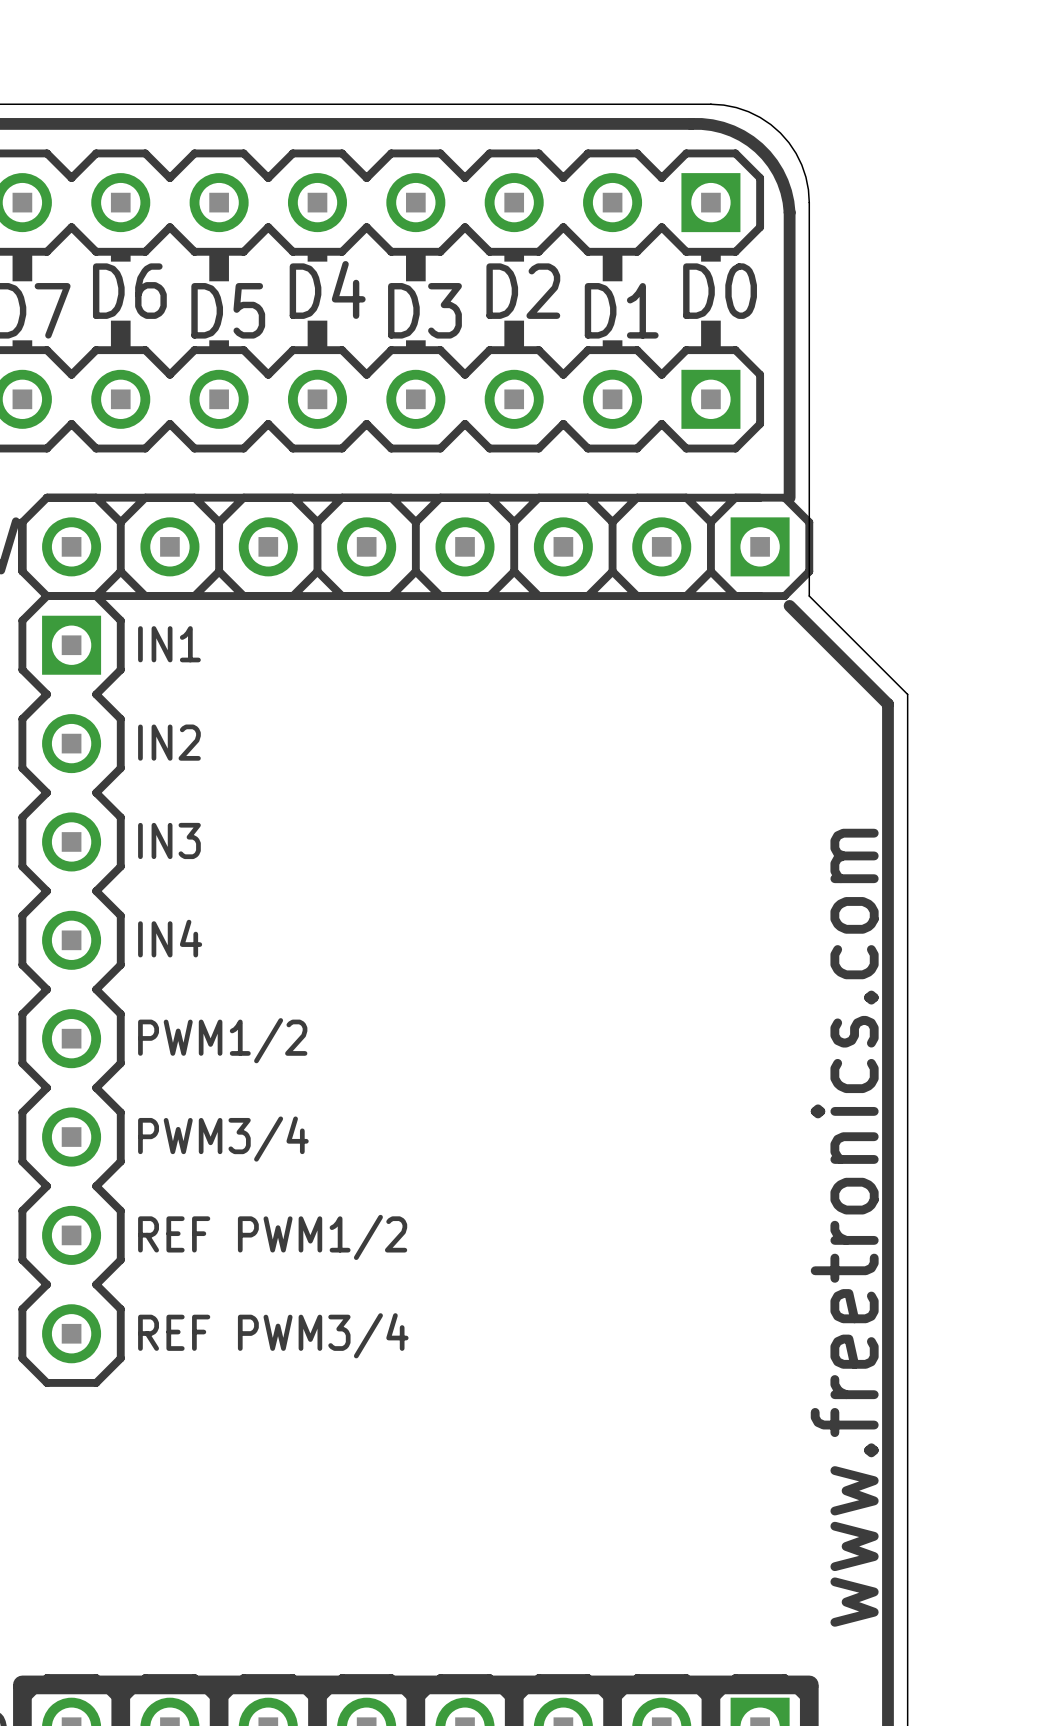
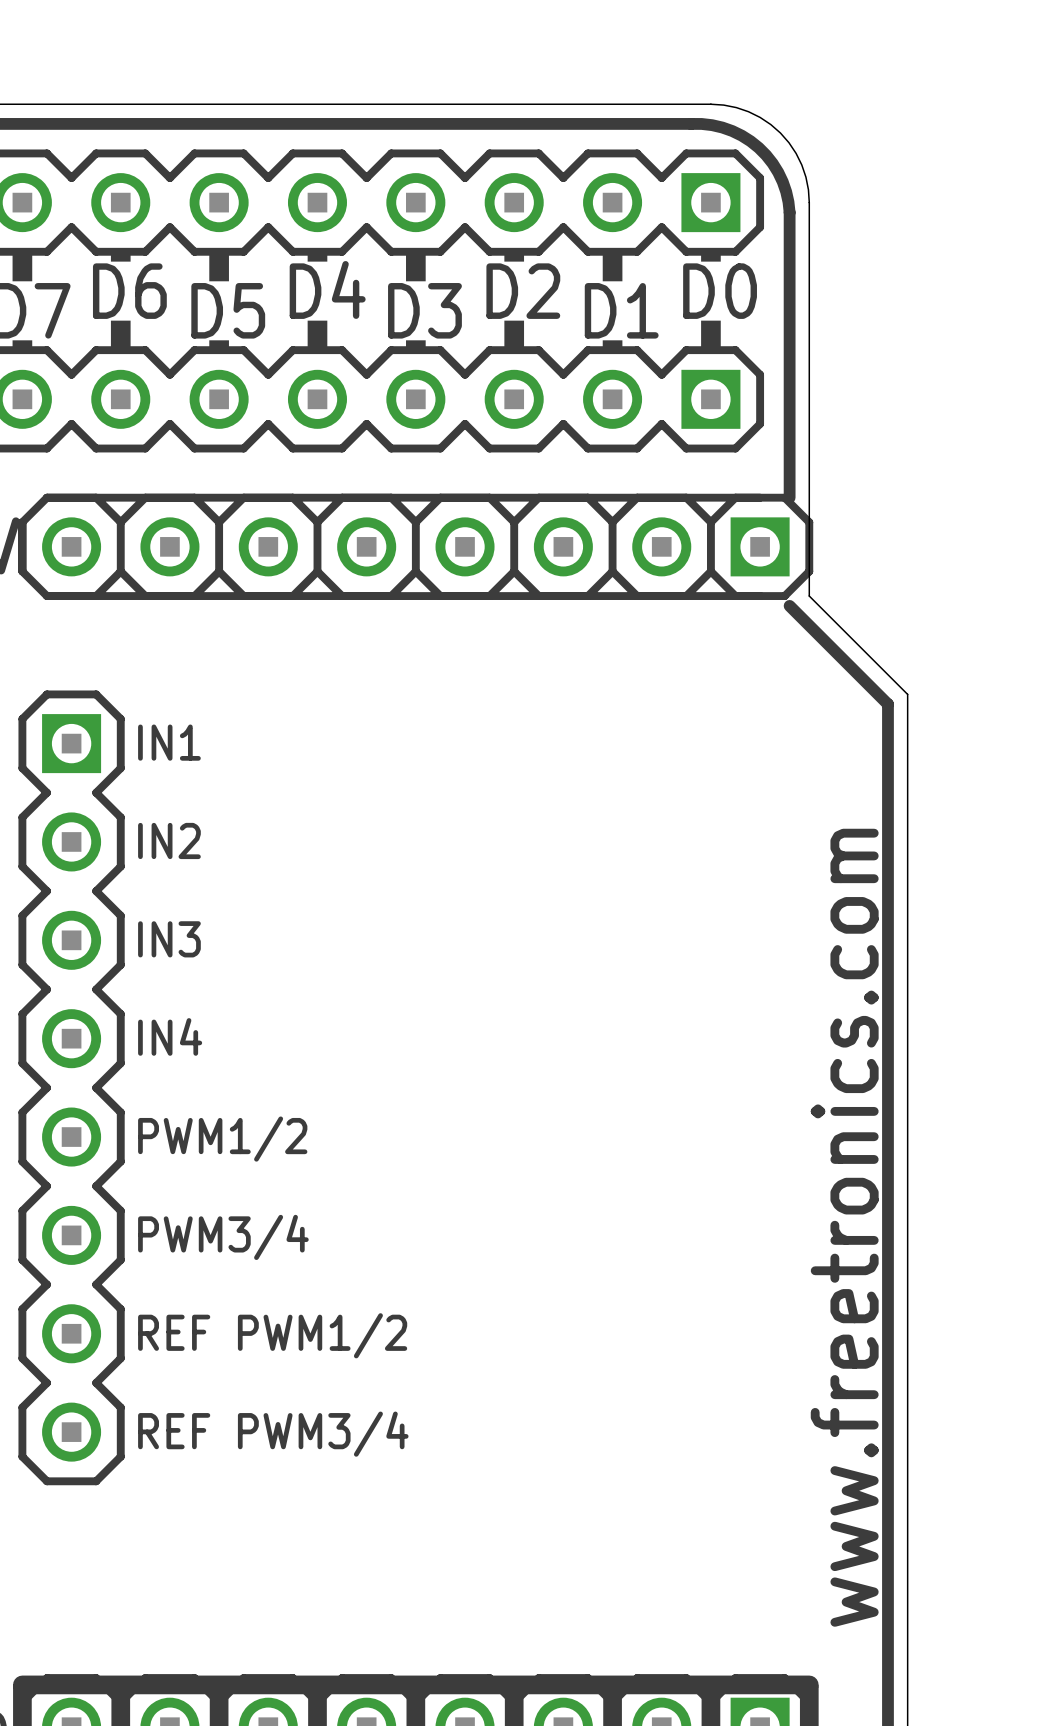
text: IN1 (169, 644) -> none
text: IN2 (169, 742) -> IN1 (169, 742)
text: IN3 (169, 840) -> IN2 (169, 840)
text: IN4 (170, 938) -> IN3 (169, 939)
part position: (71, 989) -> (71, 1087)
text: PWM1/2 (222, 1040) -> IN4 (170, 1036)
text: PWM3/4 (223, 1139) -> PWM1/2 (222, 1139)
text: REF PWM1/2 (272, 1237) -> PWM3/4 (223, 1237)
text: REF PWM3/4 (273, 1335) -> REF PWM1/2 (272, 1335)
text: none -> REF PWM3/4 (273, 1434)

